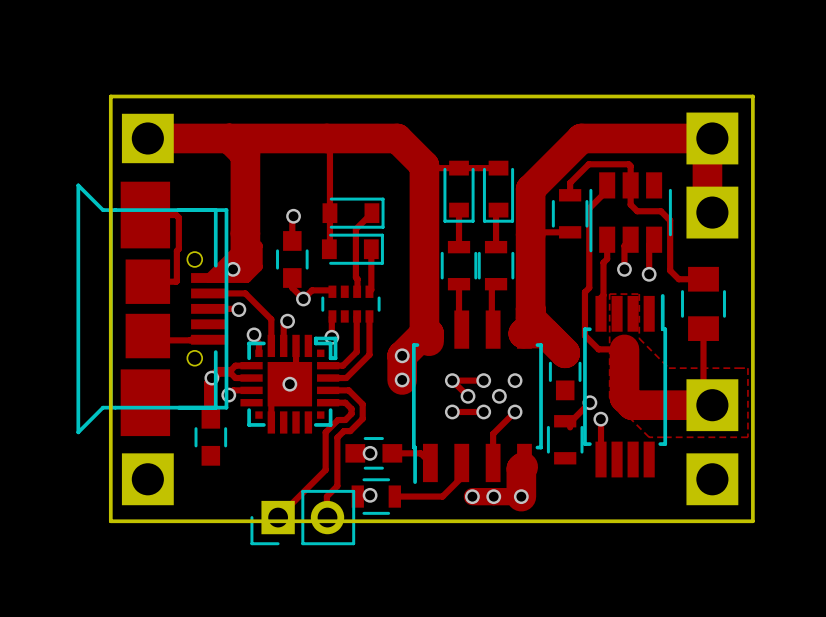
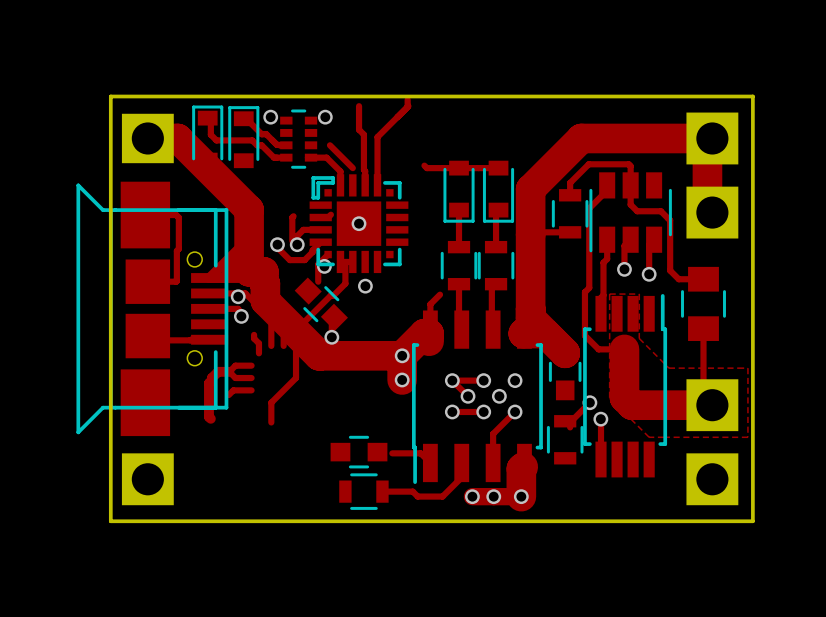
track: none -> (407, 99) (407, 106)
track: none -> (359, 106) (359, 129) (363, 134) (365, 185)
track: none -> (408, 106) (377, 137) (377, 185)
via: none -> (270, 117)
via: none -> (325, 117)
track: none -> (243, 118) (246, 118) (261, 134) (266, 134) (277, 144) (286, 145)
track: none -> (210, 121) (210, 134) (216, 140) (252, 140) (257, 145) (261, 145) (274, 157) (283, 157)
part: none -> (207, 136)
part: none -> (243, 137)
track: (177, 138) (397, 138) (424, 165) (424, 333) -> (177, 138) (249, 209) (249, 271) (263, 271) (265, 300) (320, 355)
track: (229, 138) (245, 154) (245, 257) (230, 257) -> none
track: (326, 138) (329, 141) (329, 249) -> none
track: none -> (329, 145) (352, 168)
track: none -> (307, 157) (326, 157) (340, 171) (340, 185)
part footprint: [322, 197, 385, 229] -> [309, 174, 409, 274]
track: (371, 213) (355, 229) (357, 291) -> none
via: (293, 216) -> none
via: none -> (358, 223)
track: none -> (320, 229) (303, 229) (297, 236) (297, 244)
track: none -> (320, 242) (304, 260) (289, 260) (277, 247) (277, 244)
via: none -> (277, 244)
via: none -> (297, 244)
part: (352, 249) -> none
track: (371, 249) (371, 289) (369, 291) -> none
track: none -> (328, 254) (318, 264) (318, 281)
part: (292, 259) -> none
track: none -> (346, 261) (345, 283) (333, 295) (330, 295) (295, 332) (319, 355) (402, 355)
via: none -> (324, 266)
via: (233, 269) -> none
track: (292, 278) (292, 287) (303, 299) (312, 290) (332, 291) -> none
via: none -> (365, 286)
track: none -> (440, 294) (430, 304) (430, 329)
via: none -> (238, 296)
via: (303, 299) -> none
part: none -> (321, 304)
part rotation: 0° (350, 304) -> 90° clockwise (298, 139)
part position: (350, 304) -> (298, 139)
via: (238, 309) -> none
via: none -> (241, 316)
track: (357, 316) (356, 351) (342, 365) (328, 365) -> none
track: (369, 316) (369, 354) (346, 378) (328, 378) -> none
via: (287, 321) -> none
via: (254, 334) -> none
via: (211, 378) -> none
part: (289, 384) -> none
via: (289, 384) -> none
track: (328, 390) (348, 390) (362, 404) (362, 418) (350, 431) (343, 431) (337, 437) (337, 486) (326, 496) (326, 521) -> none
via: (228, 395) -> none
track: (328, 402) (345, 402) (351, 408) (351, 413) (345, 420) (338, 420) (325, 432) (325, 470) (278, 517) -> none
part: (210, 437) -> none
via: (370, 453) -> none
part position: (373, 453) -> (358, 452)
via: (370, 495) -> none
part position: (376, 496) -> (363, 491)
track: (394, 496) (417, 496) -> (382, 491) (412, 491) (417, 496)
part: (302, 517) -> none

